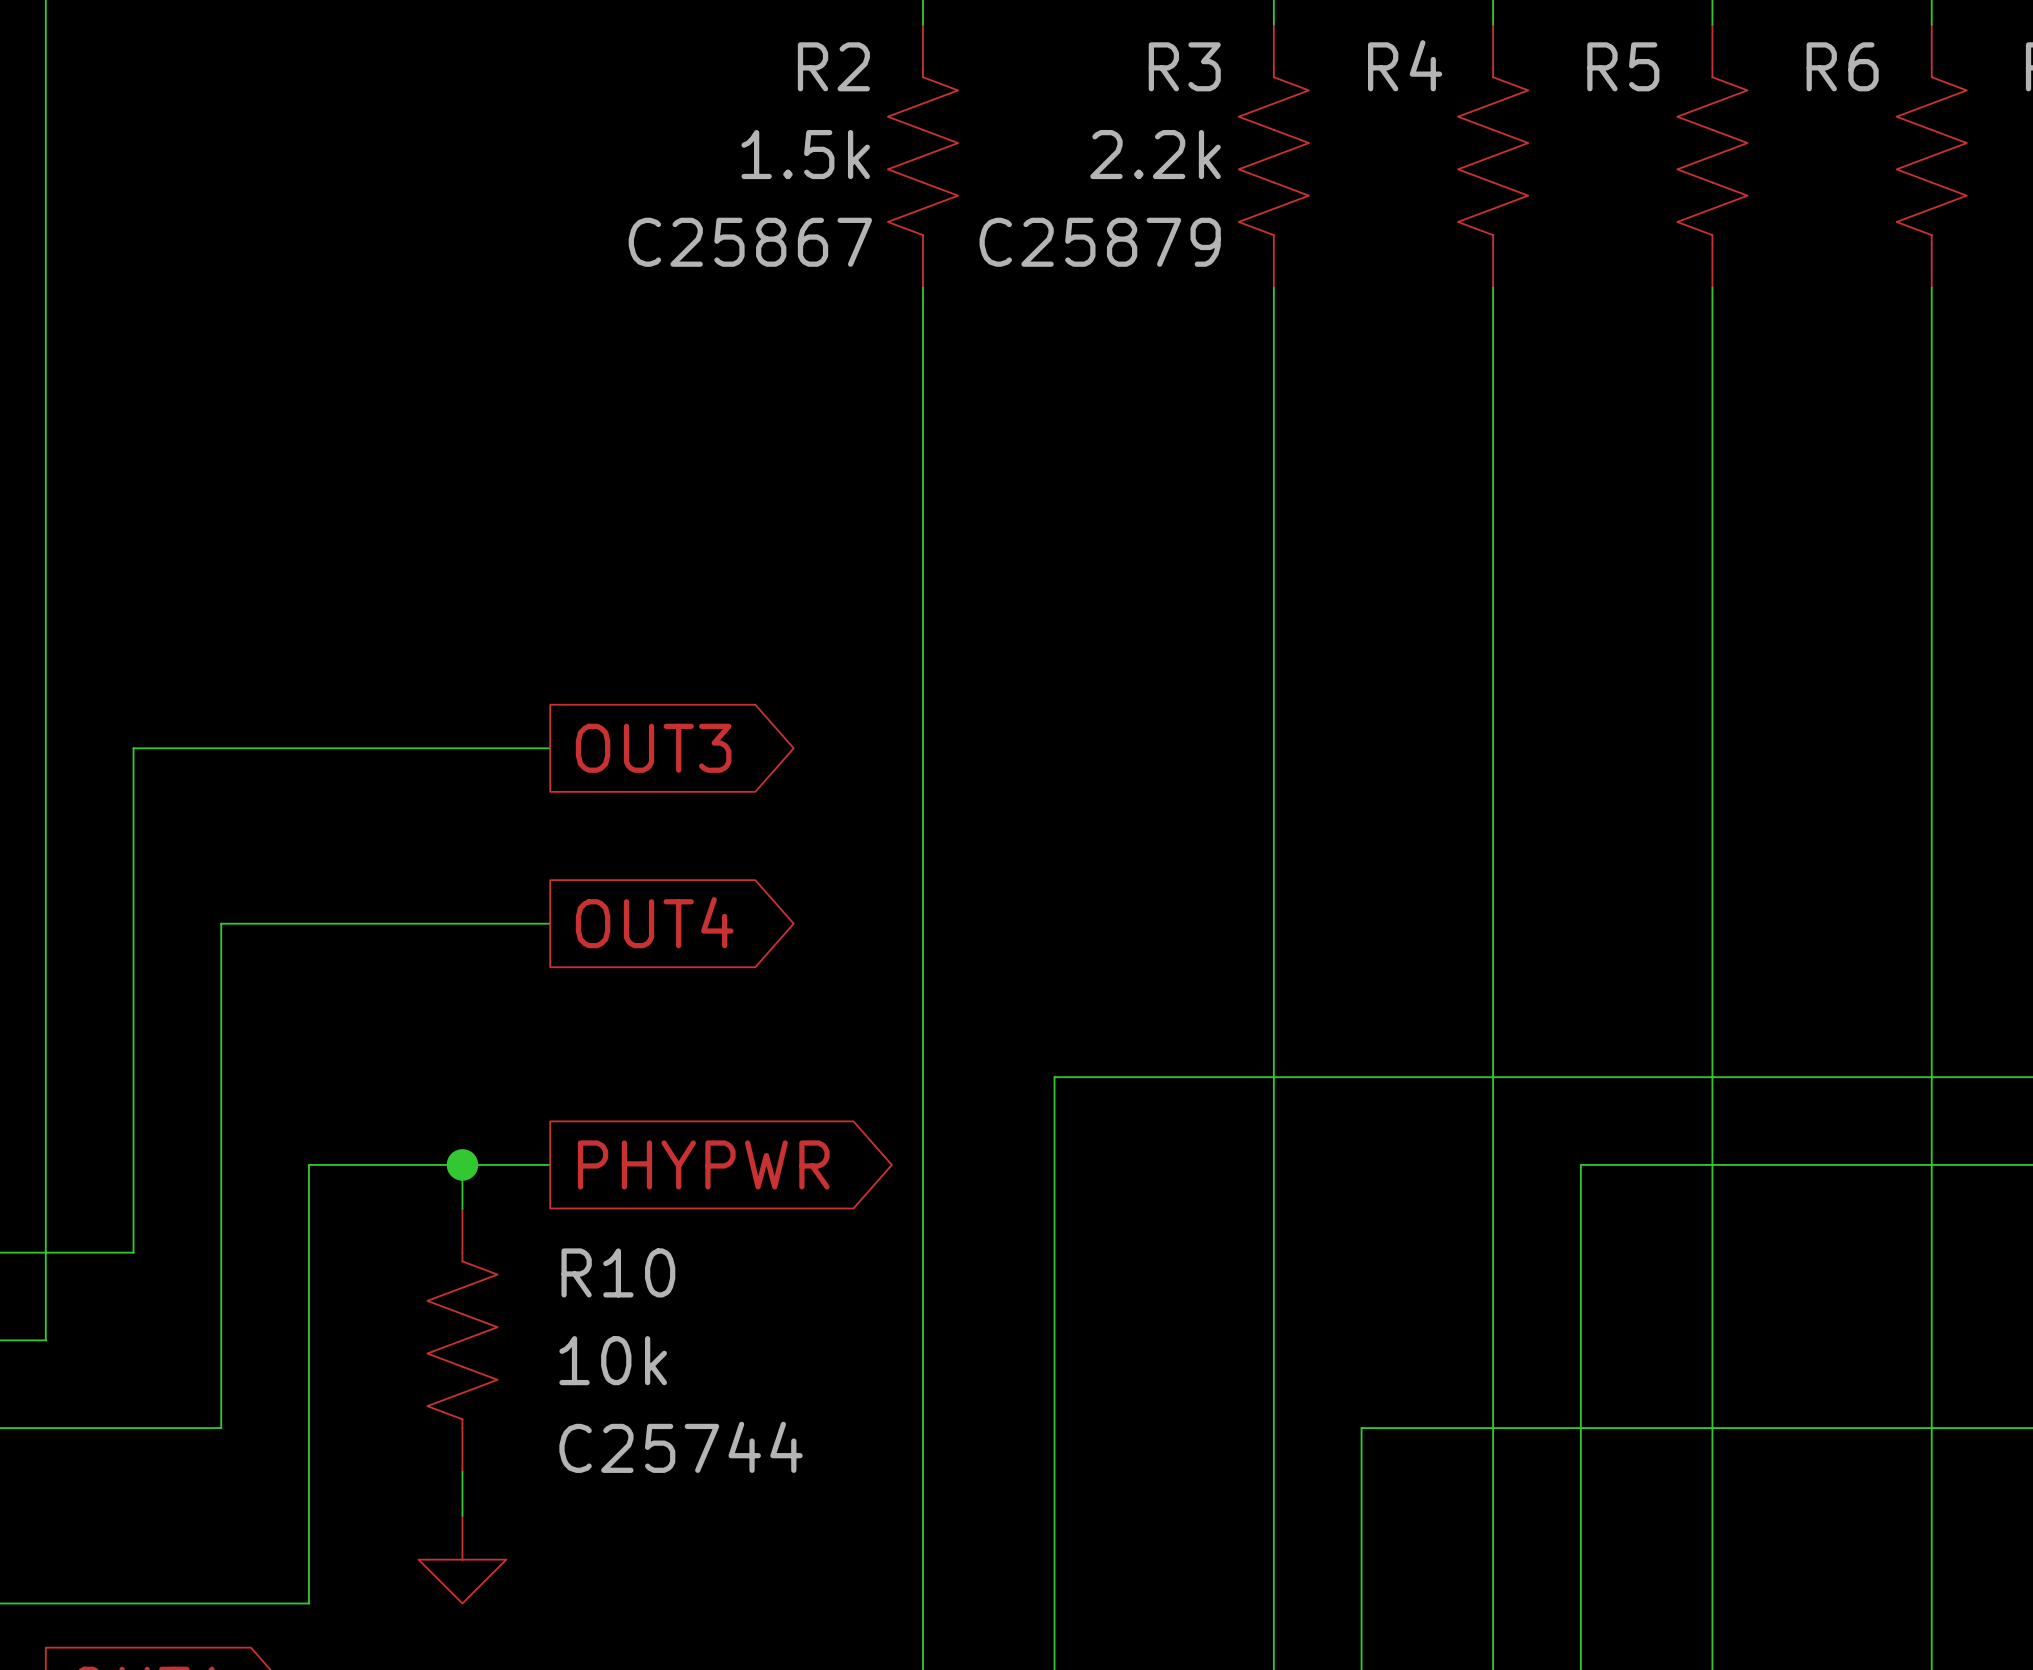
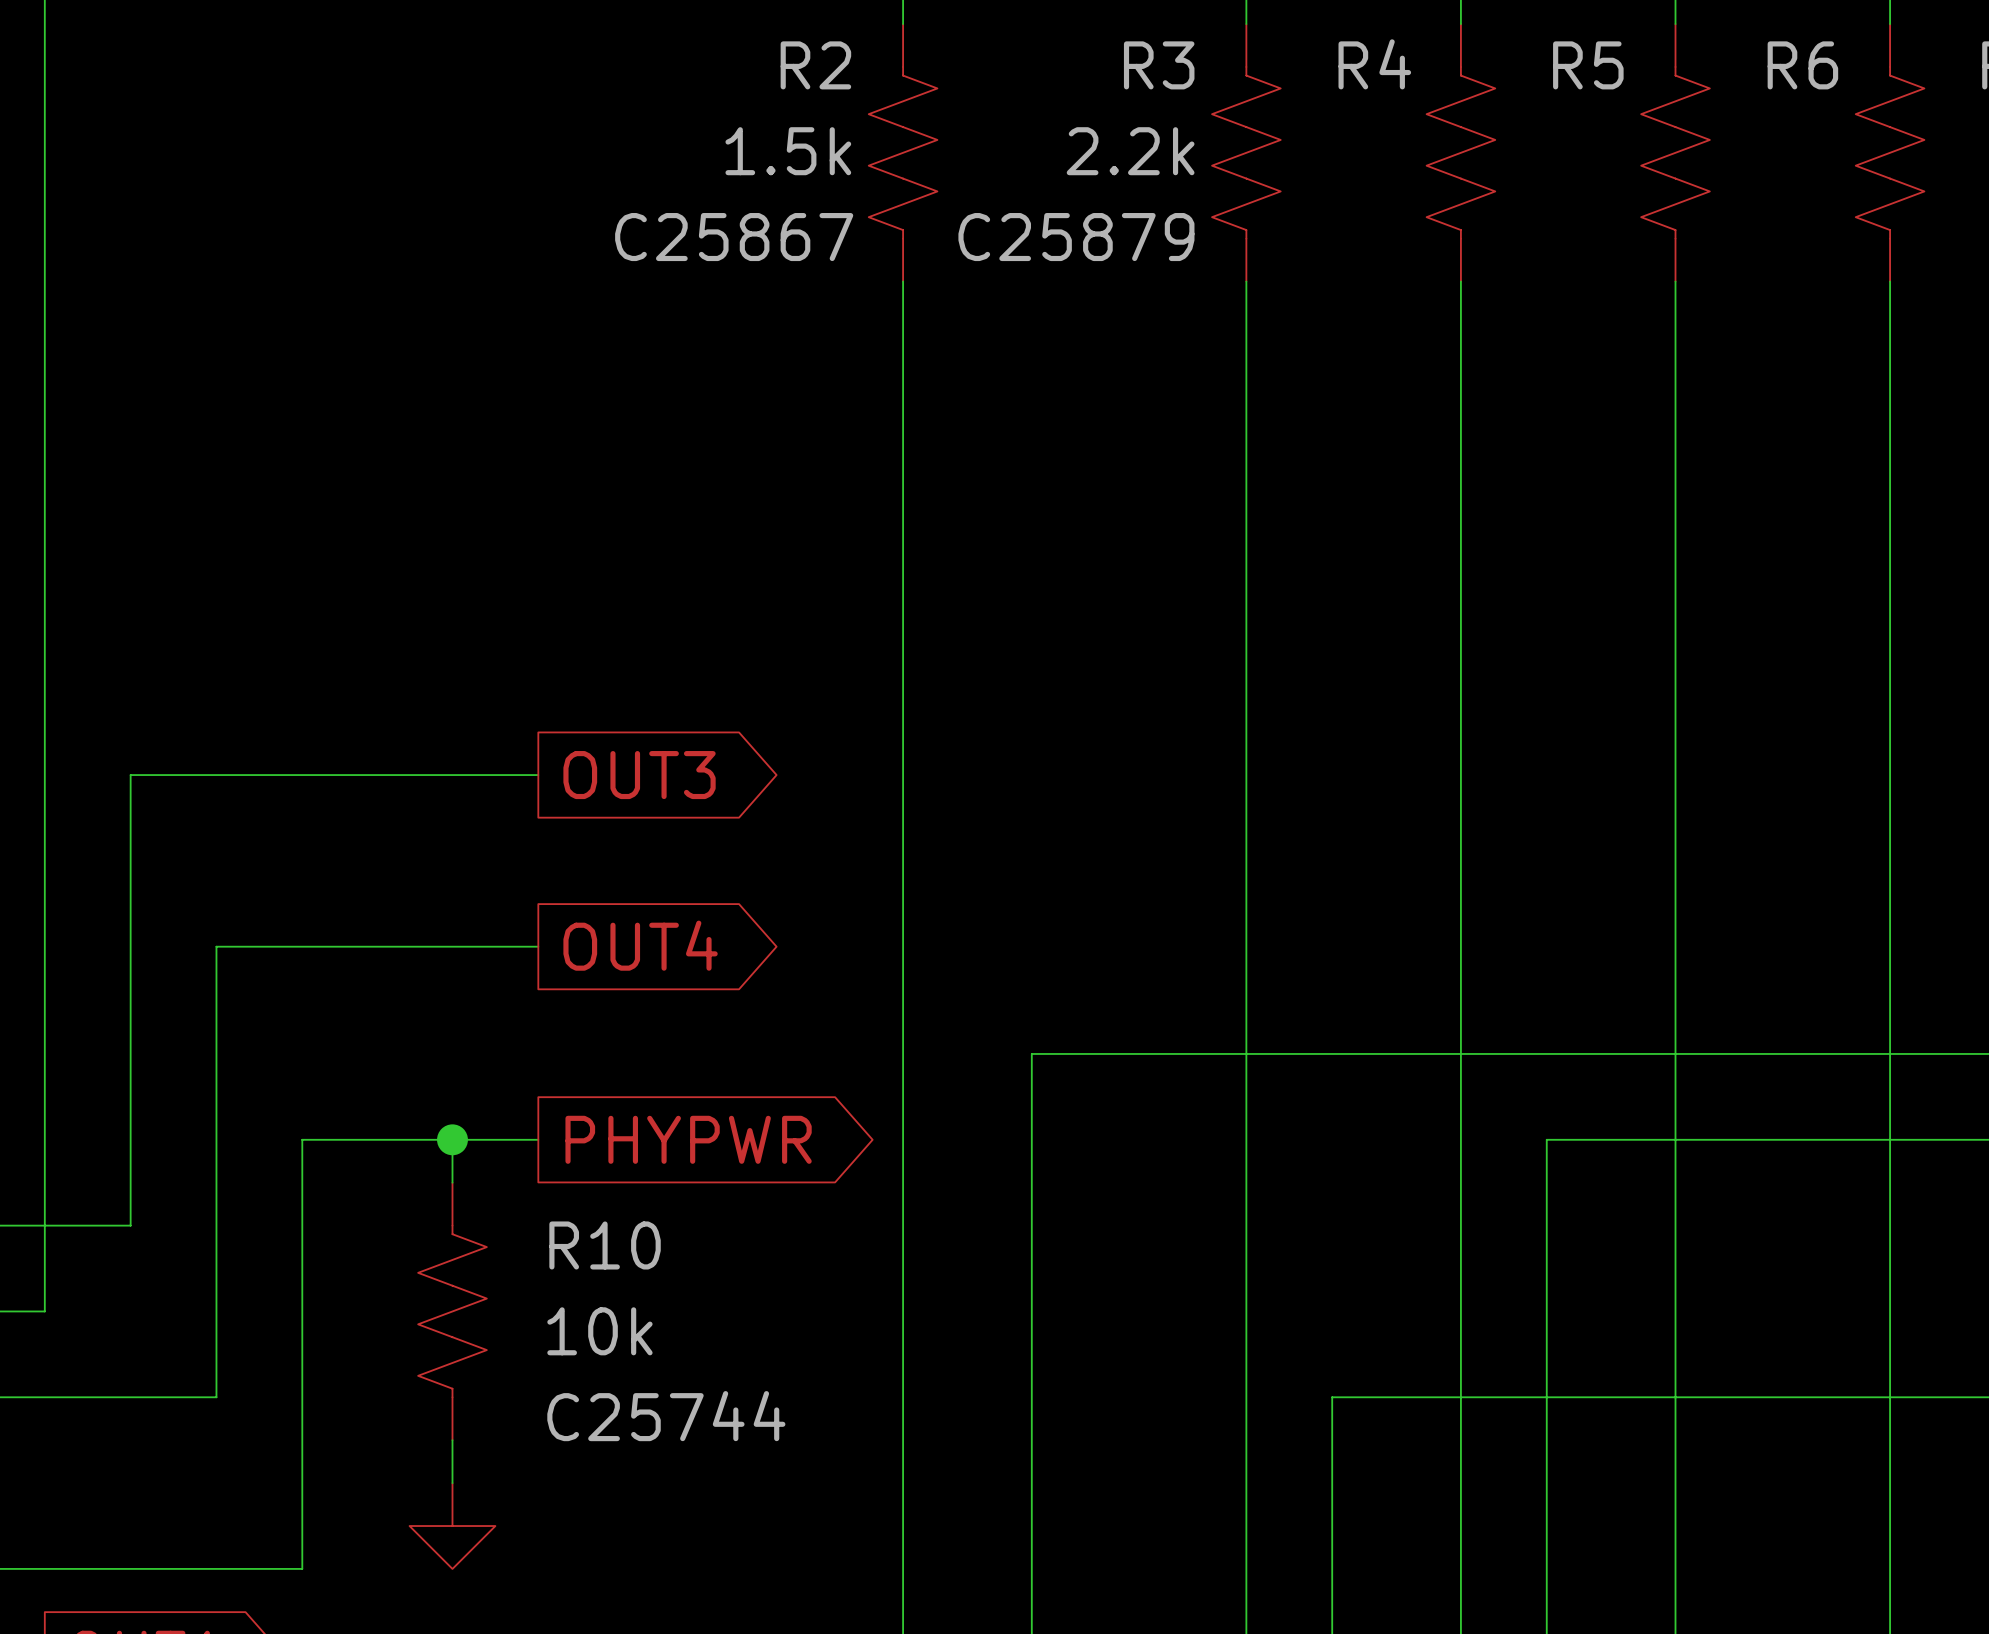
wire: (550, 748) (133, 748) (133, 792) -> (538, 775) (130, 775)
global label position: OUT3 (653, 748) -> OUT3 (639, 775)
global label position: OUT4 (654, 922) -> OUT4 (640, 945)
wire: (550, 923) (221, 923) (221, 967) -> (538, 946) (216, 946)

